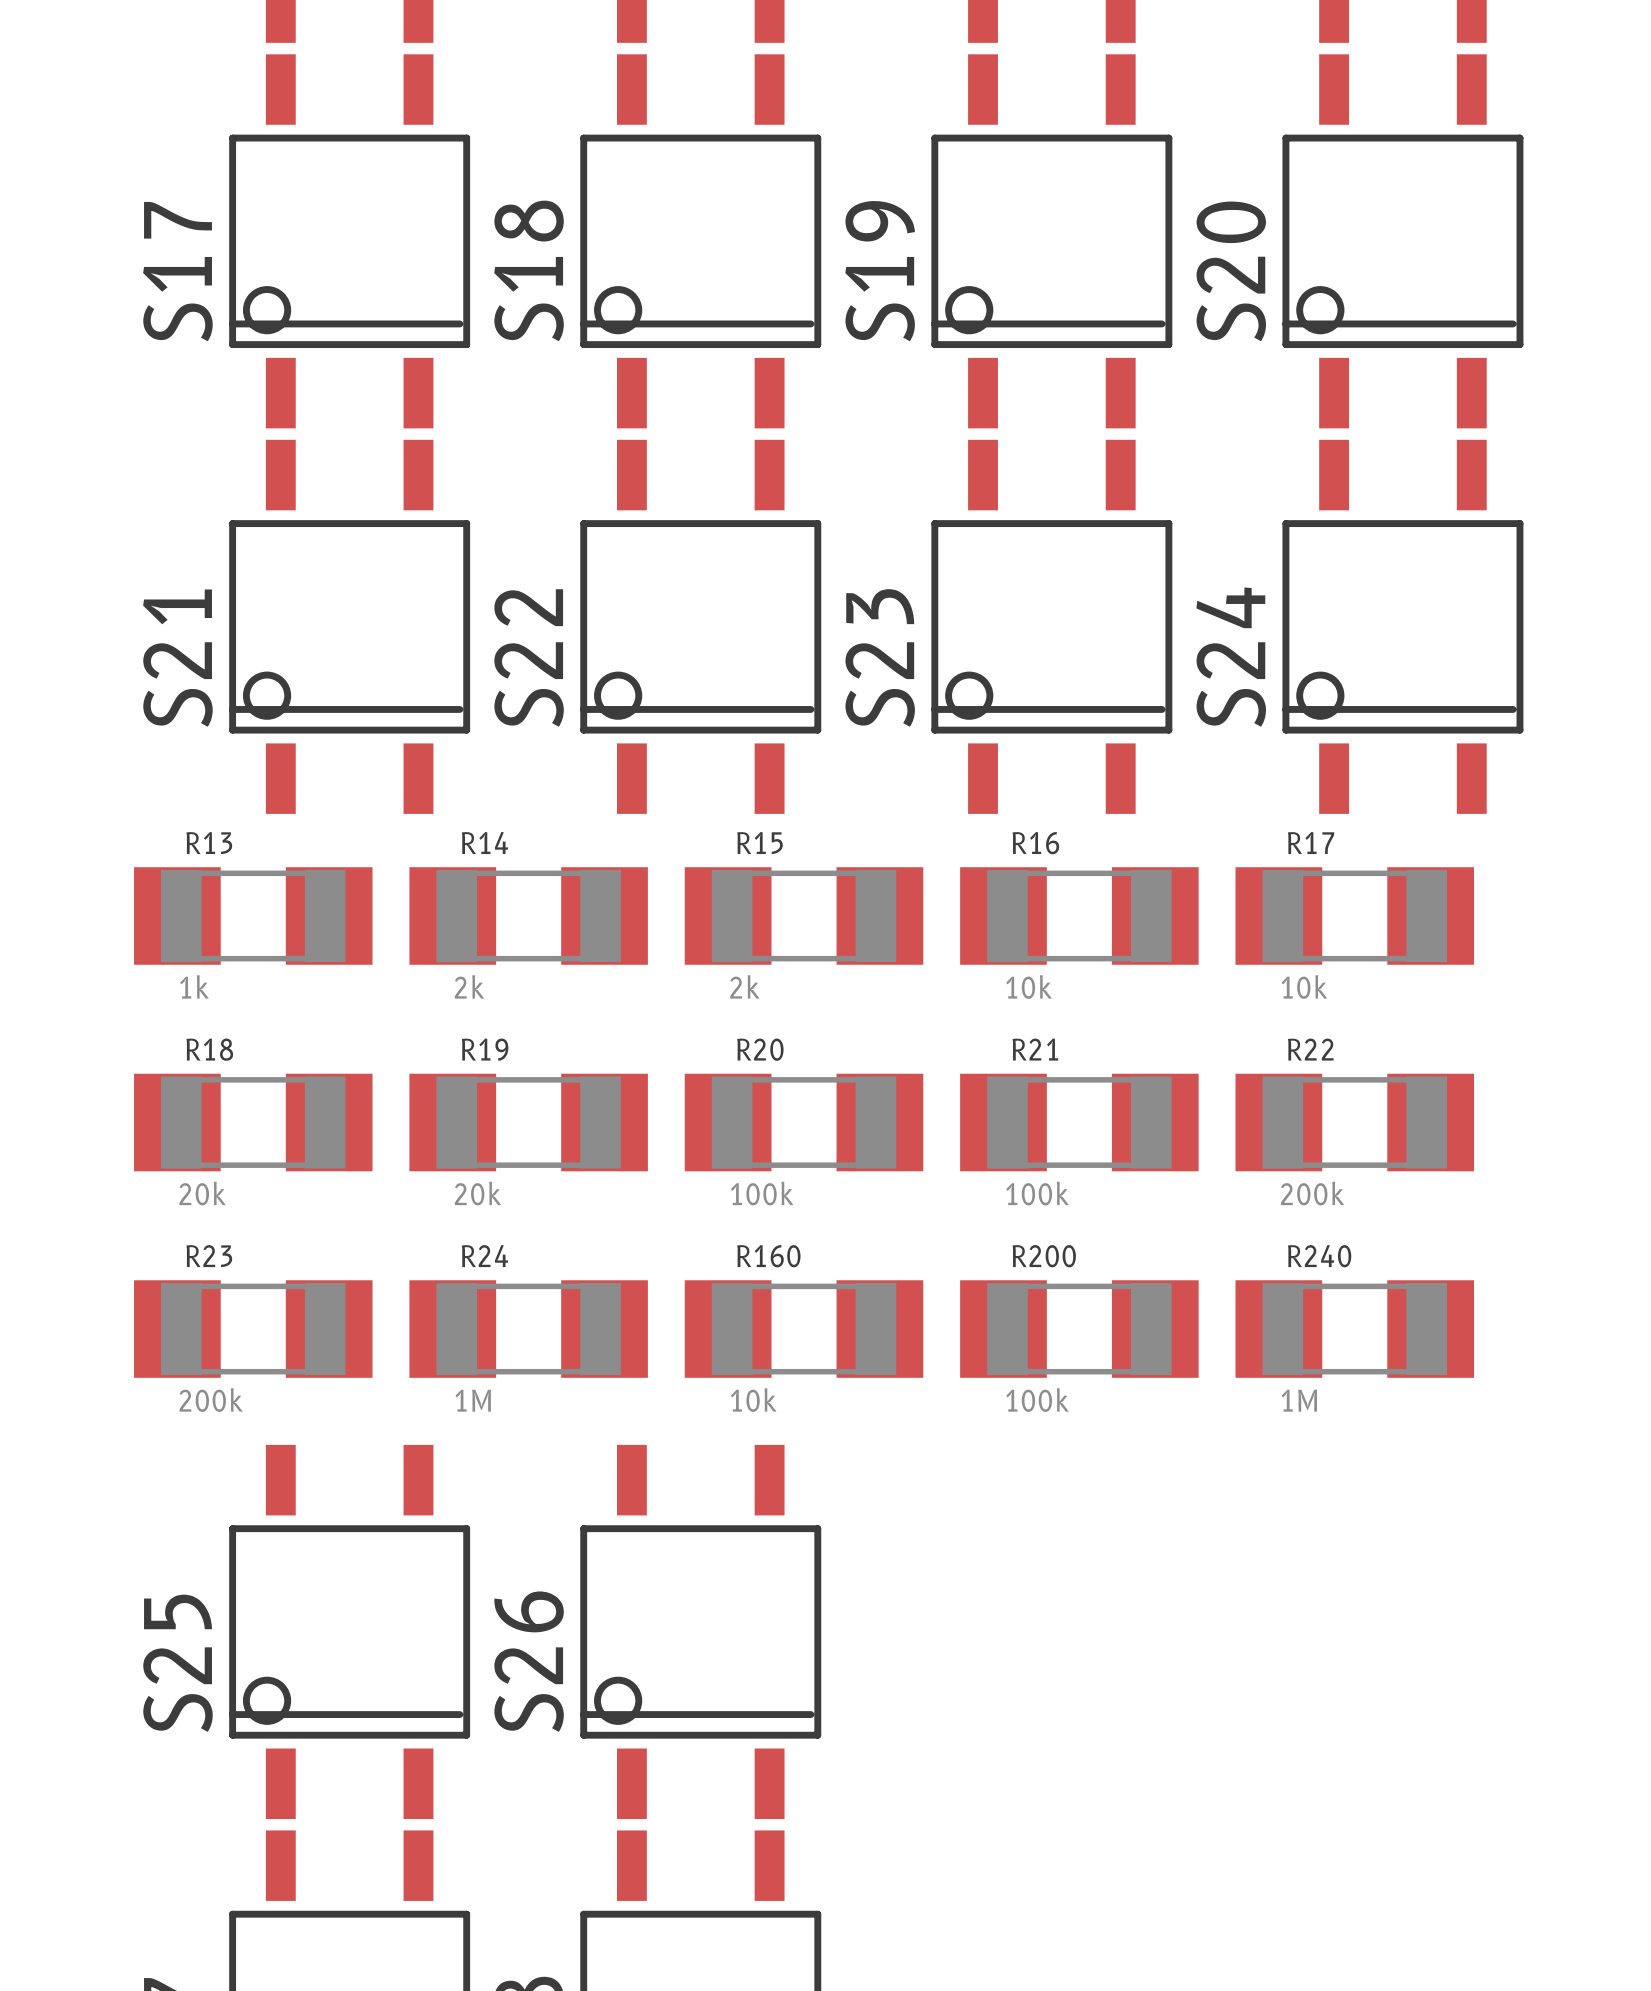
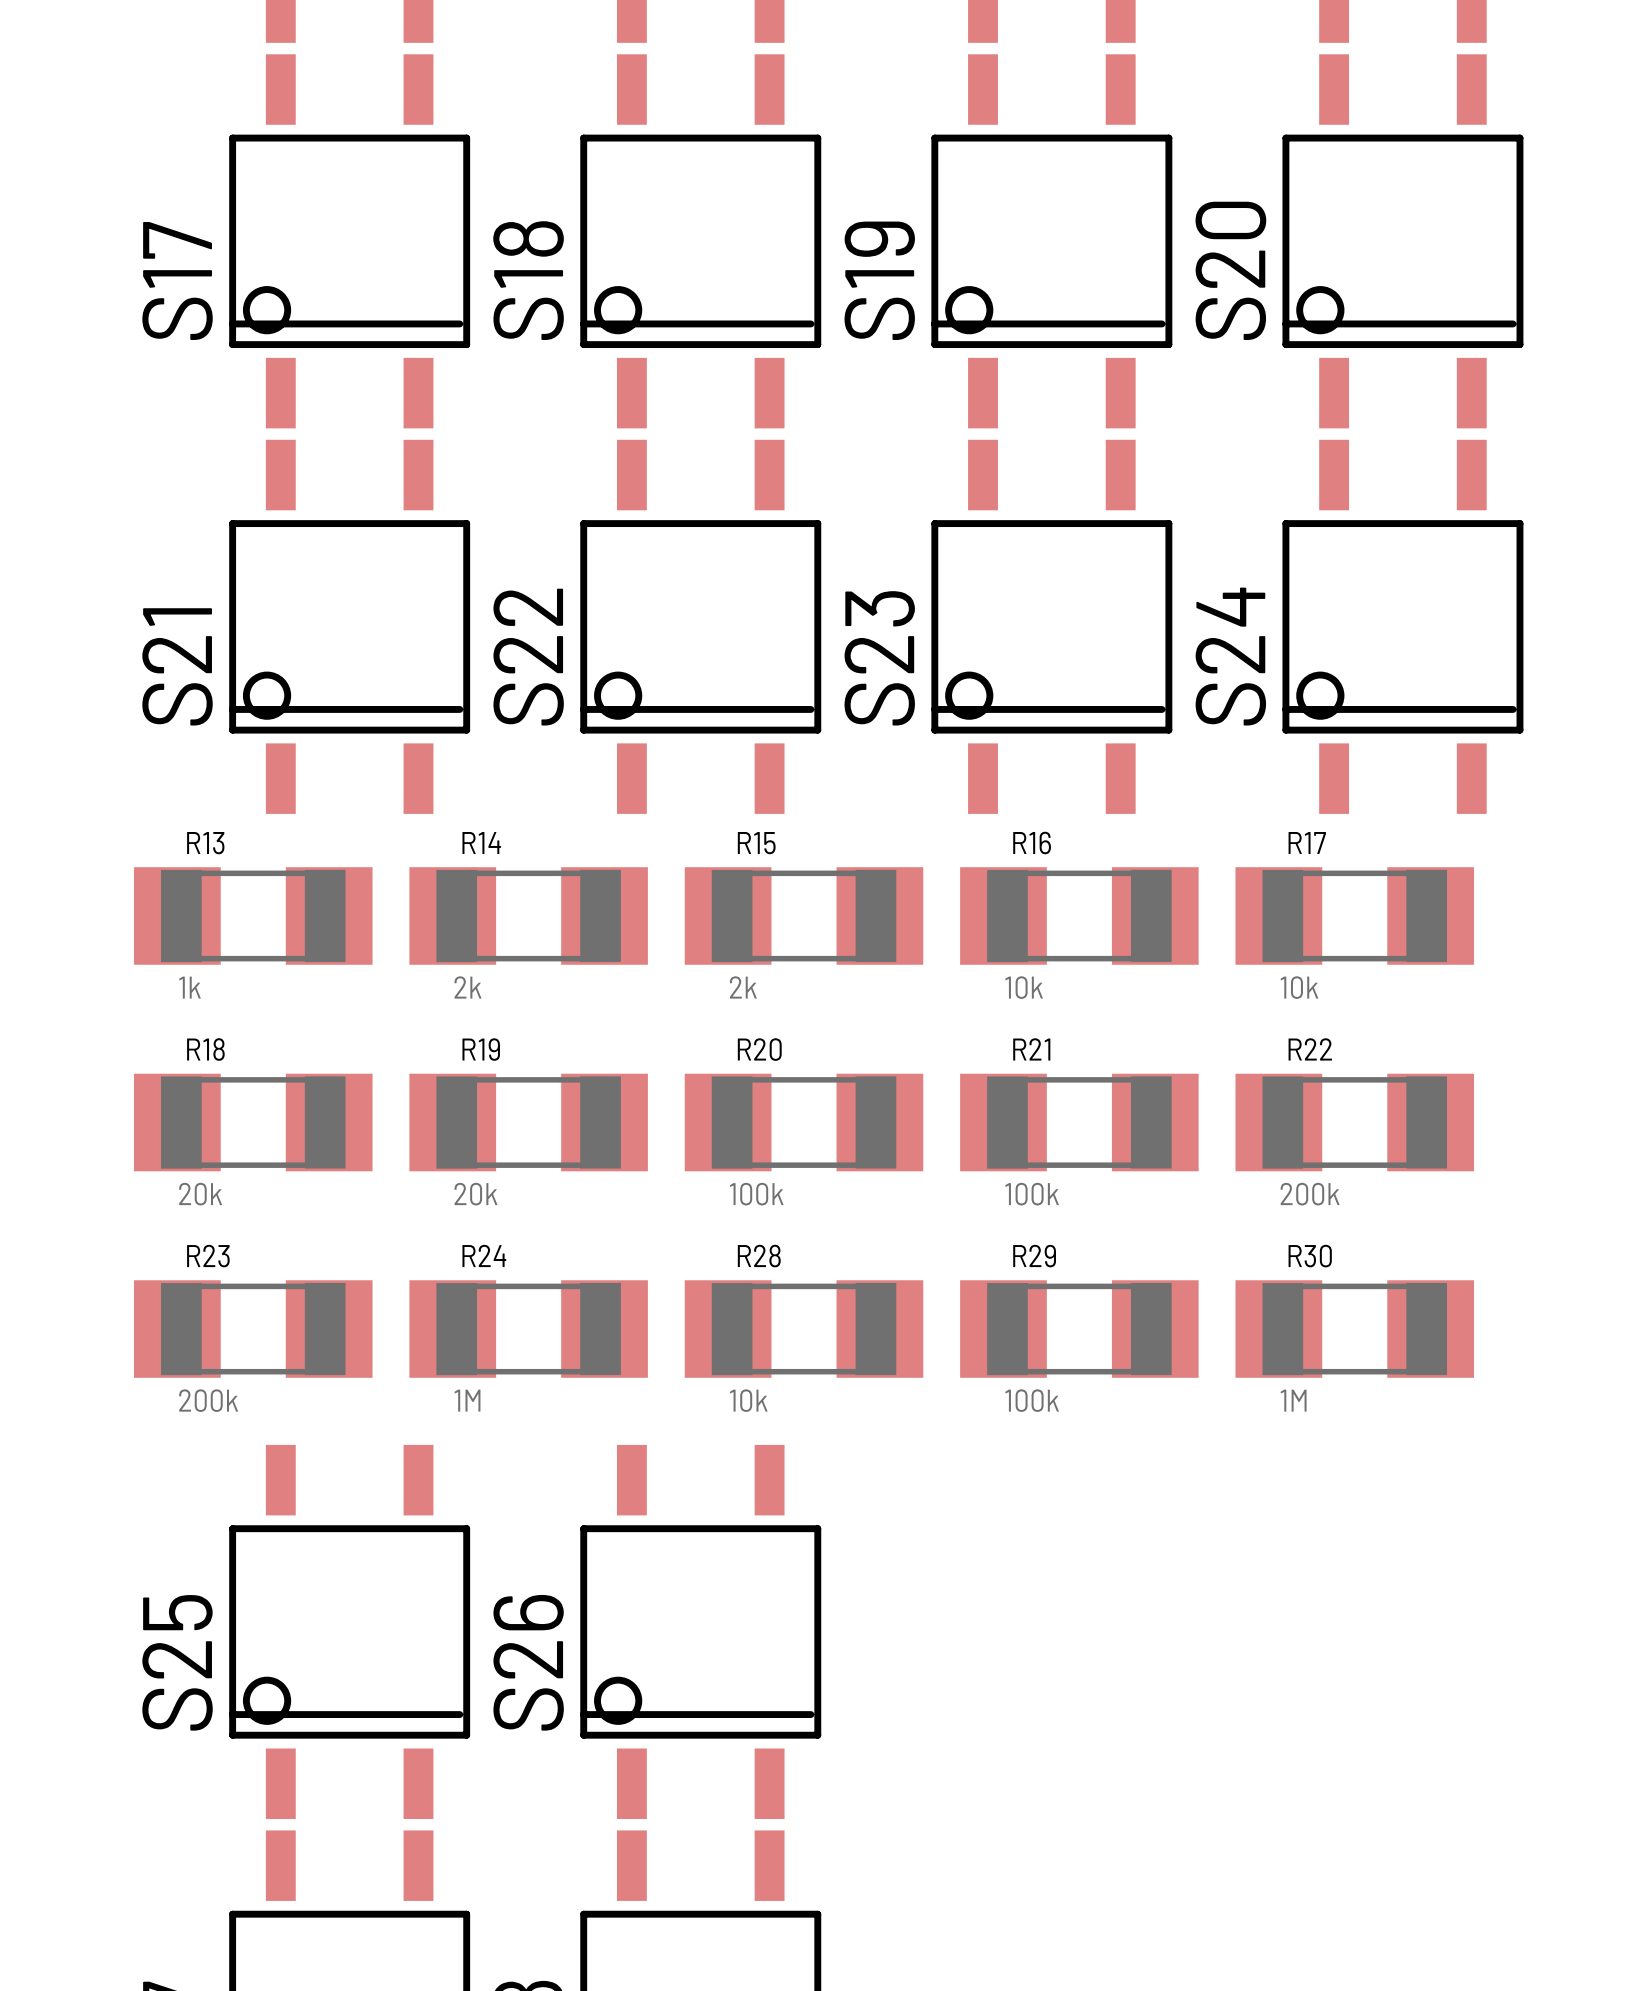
R160 name: R160 (768, 1256) -> R28 (759, 1256)
R200 name: R200 (1044, 1256) -> R29 (1034, 1256)
R240 name: R240 (1319, 1256) -> R30 (1310, 1256)

